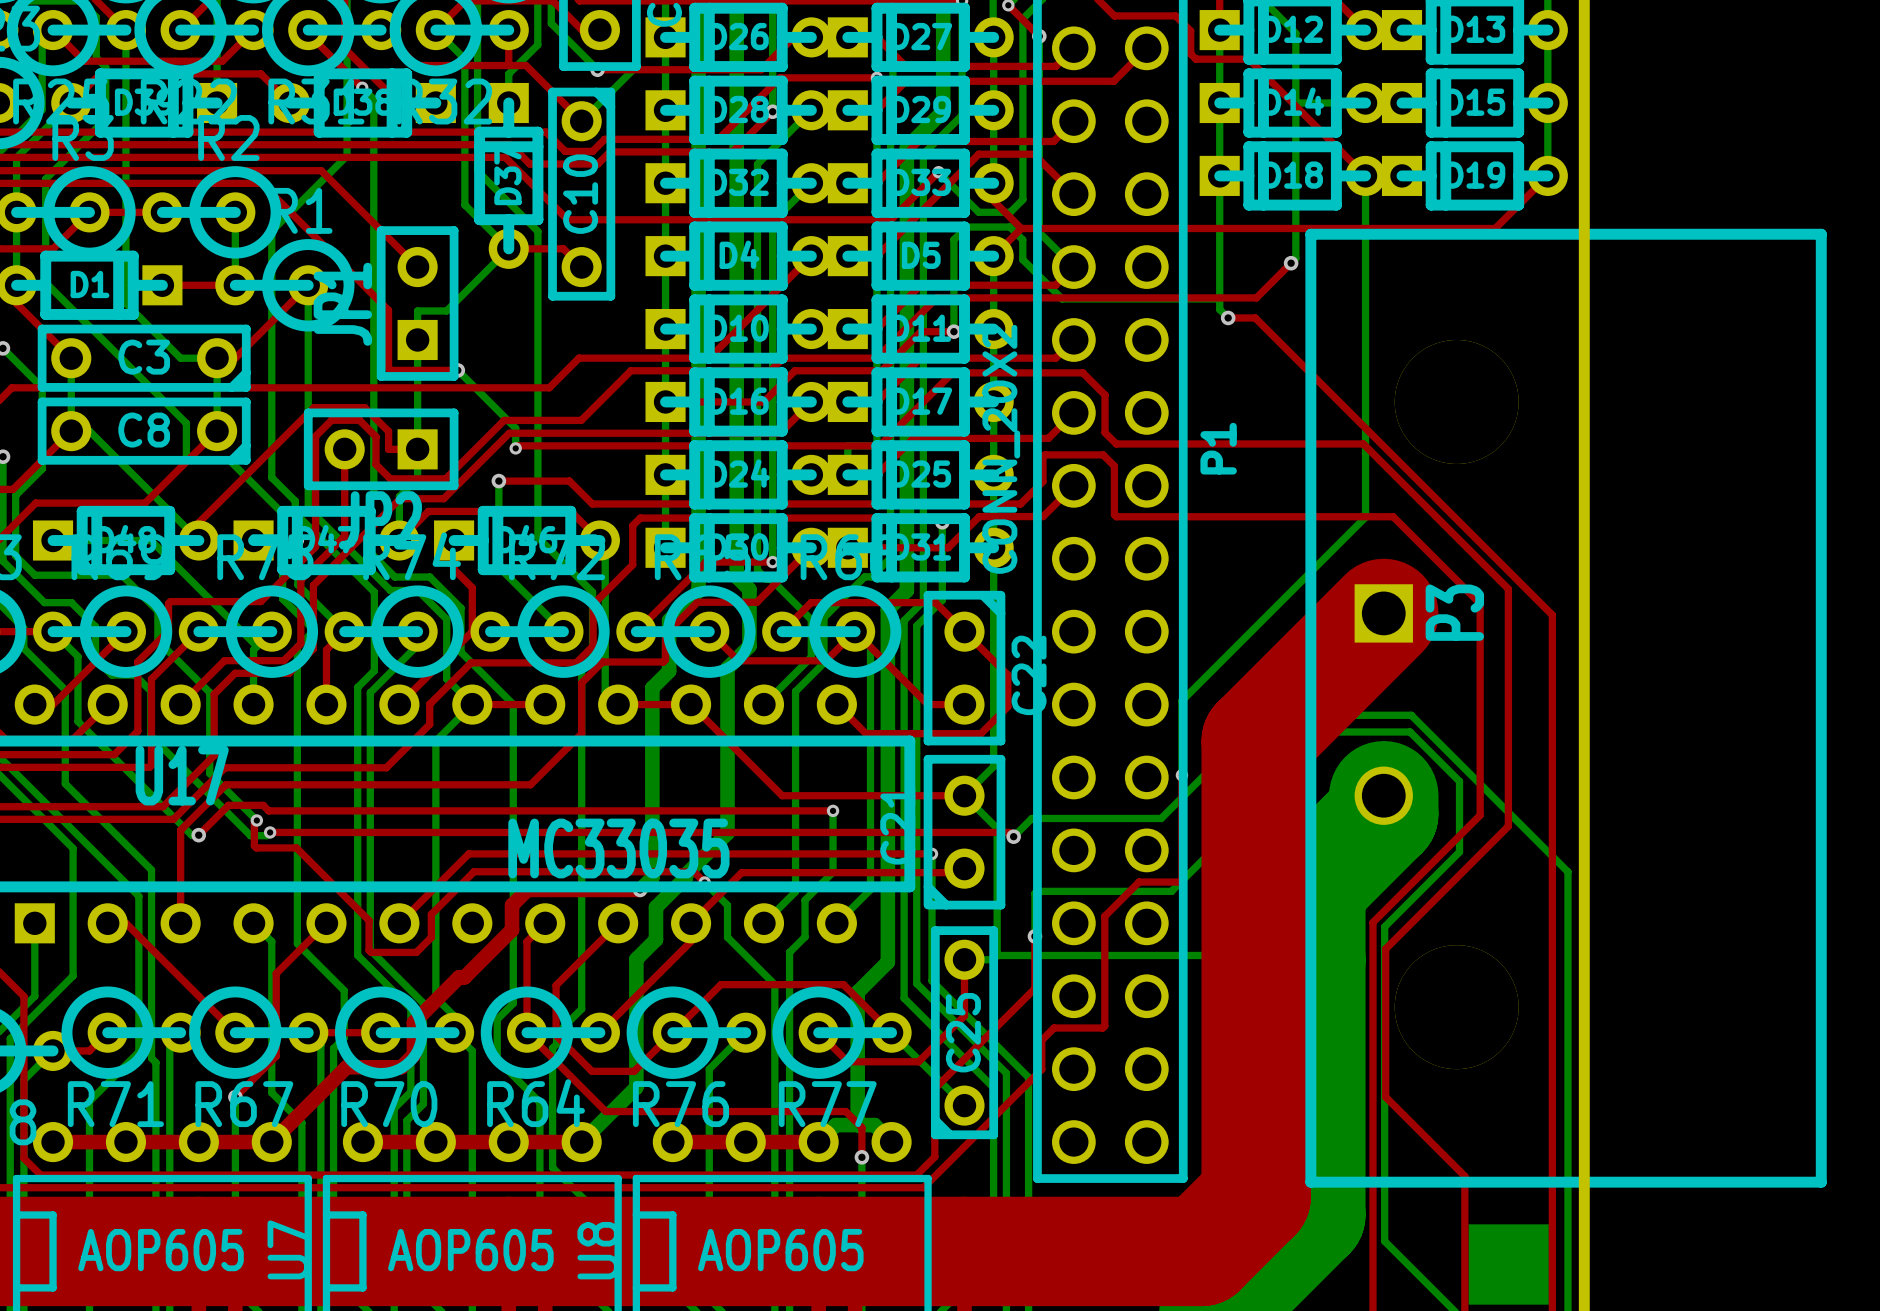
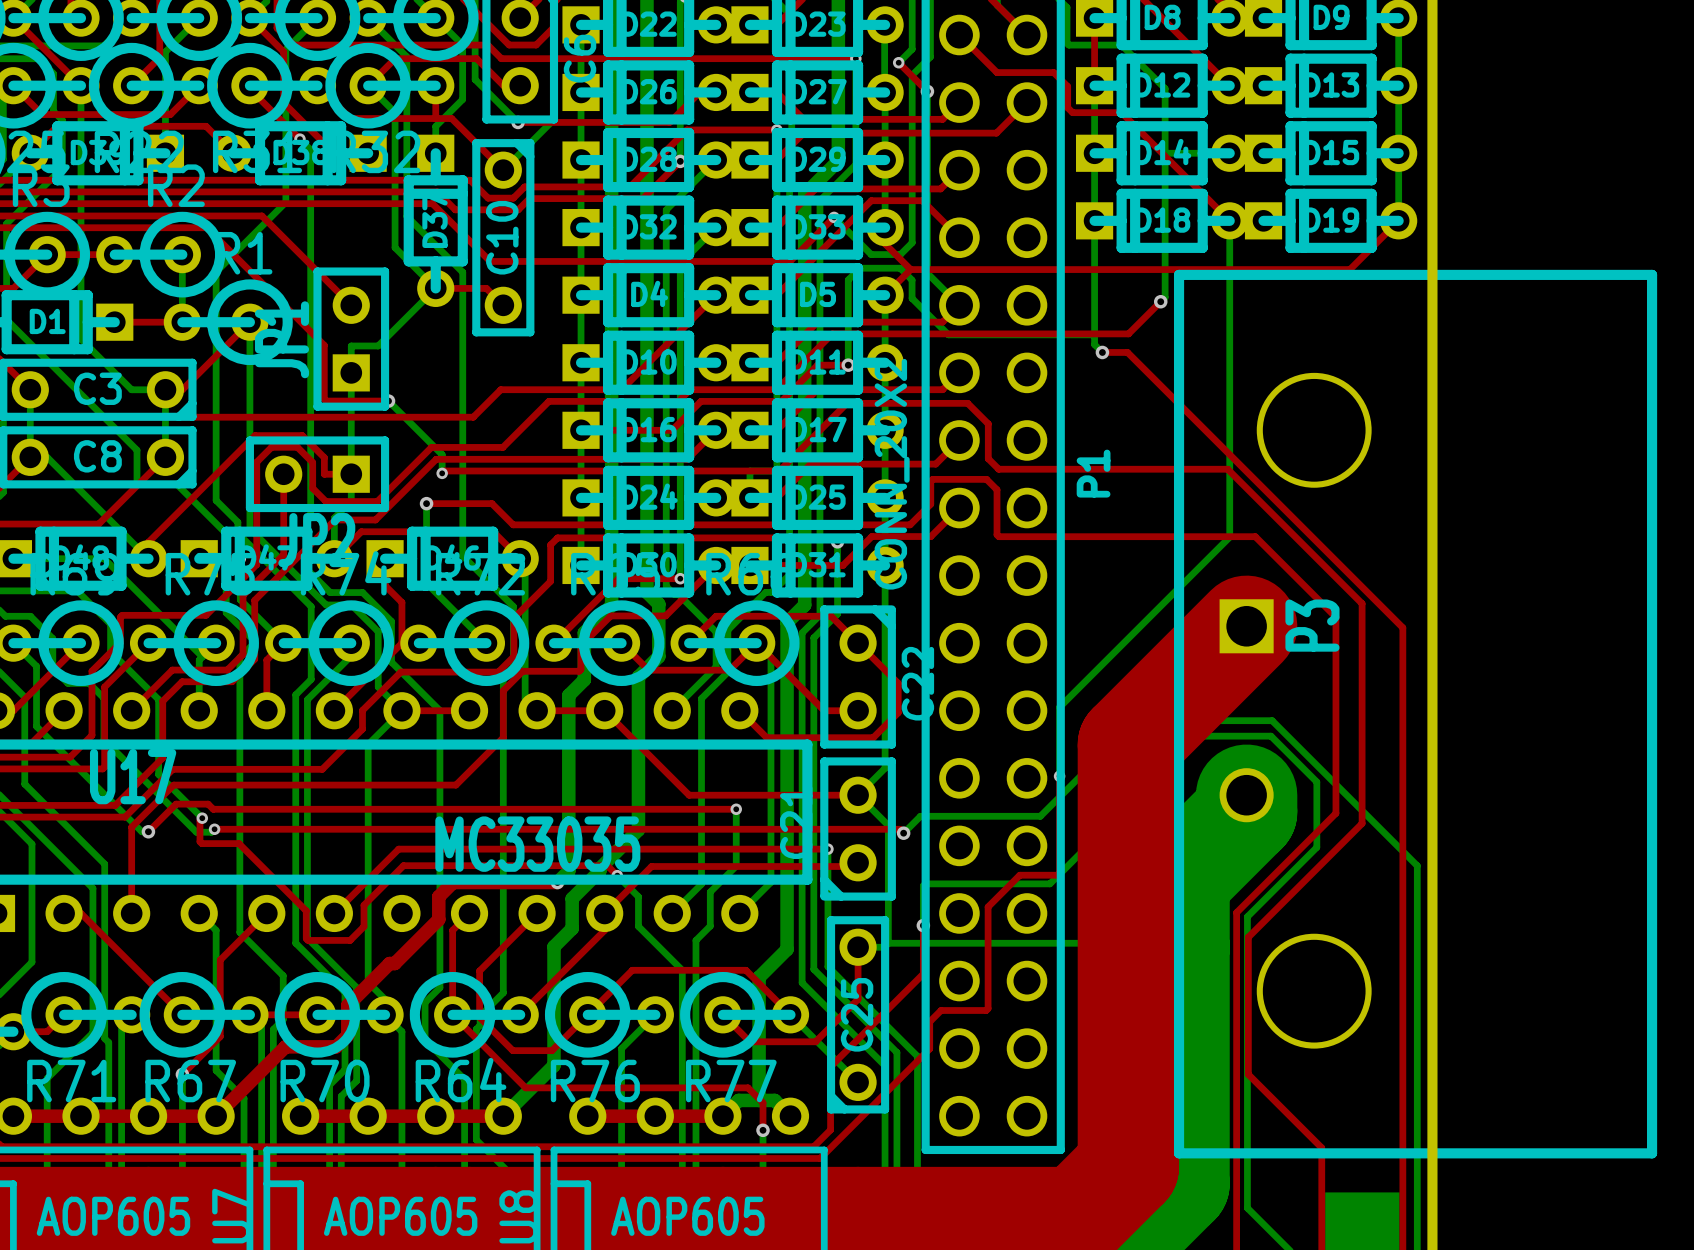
P3 footprint: [1305, 228, 1827, 1188] -> [1173, 269, 1658, 1159]

